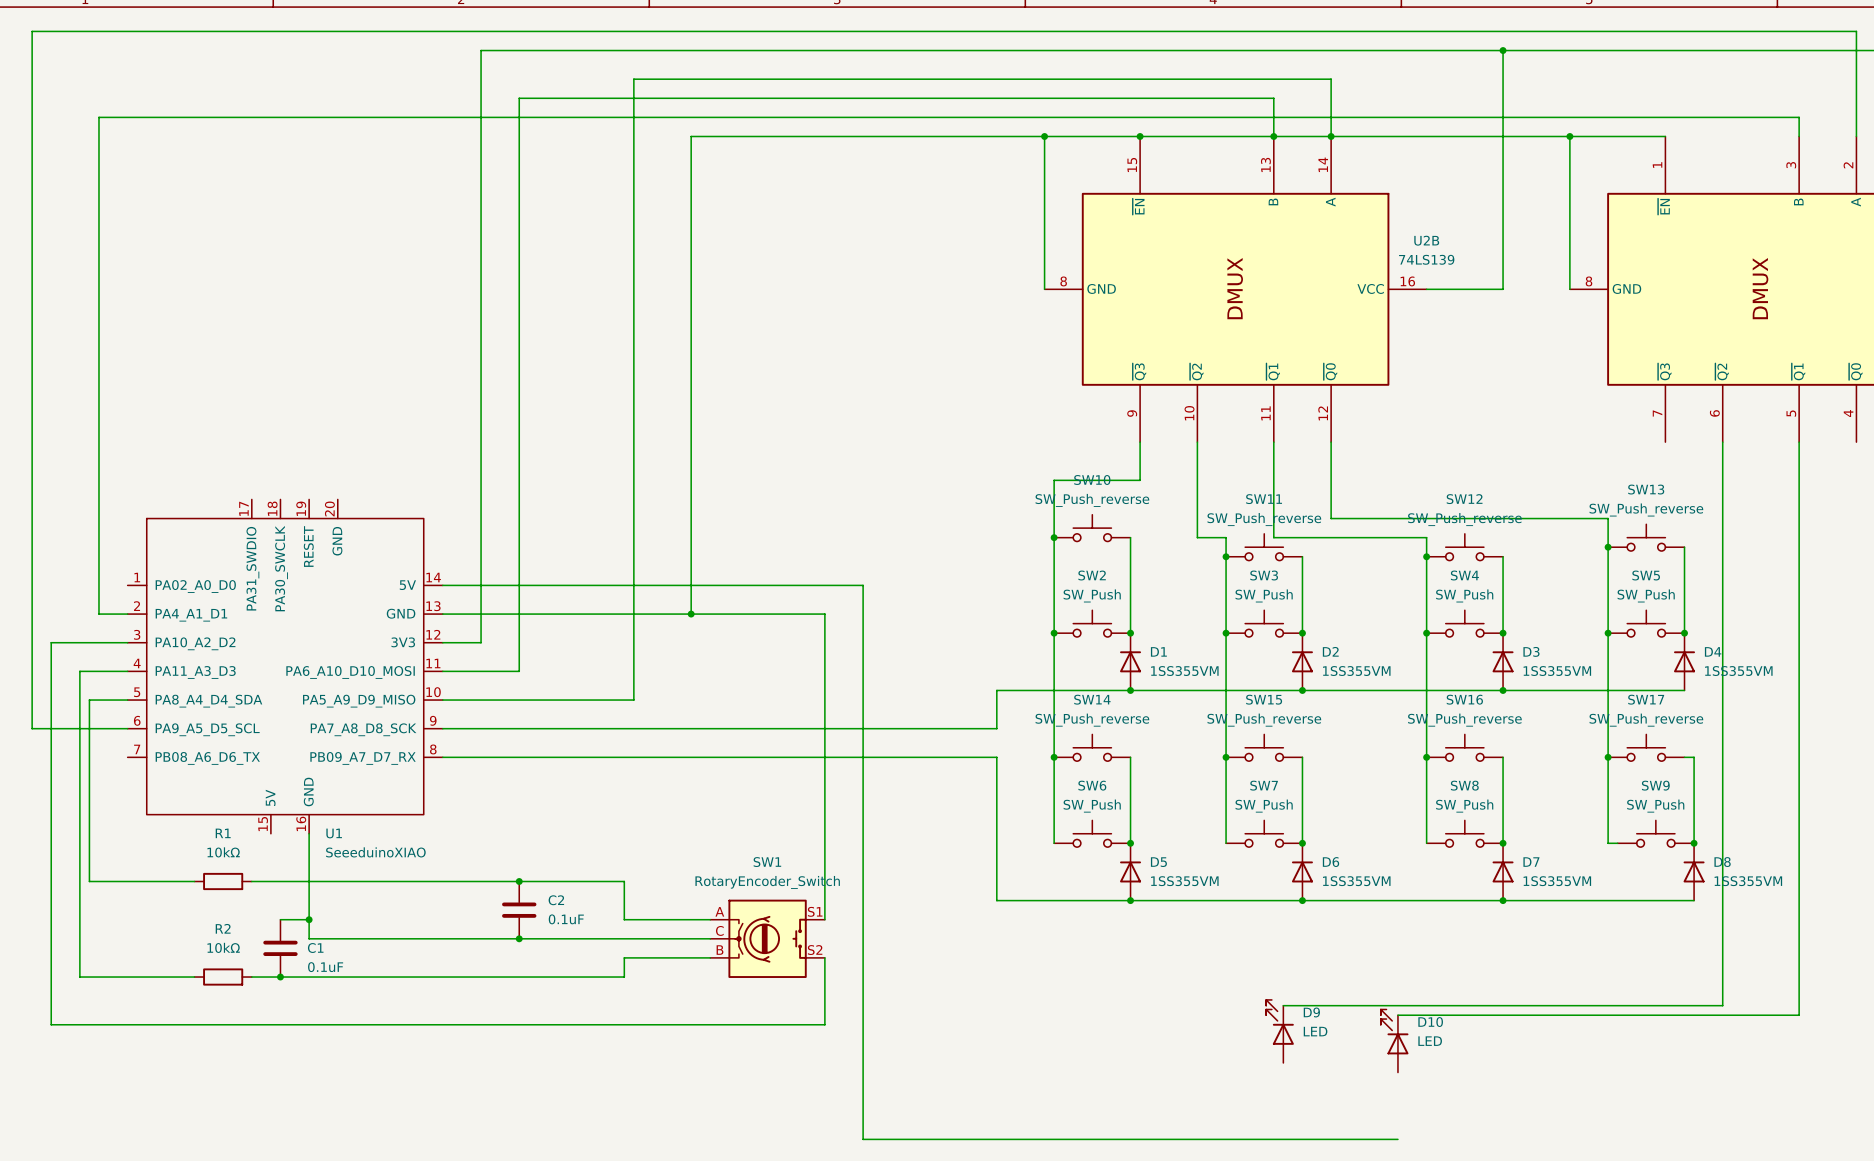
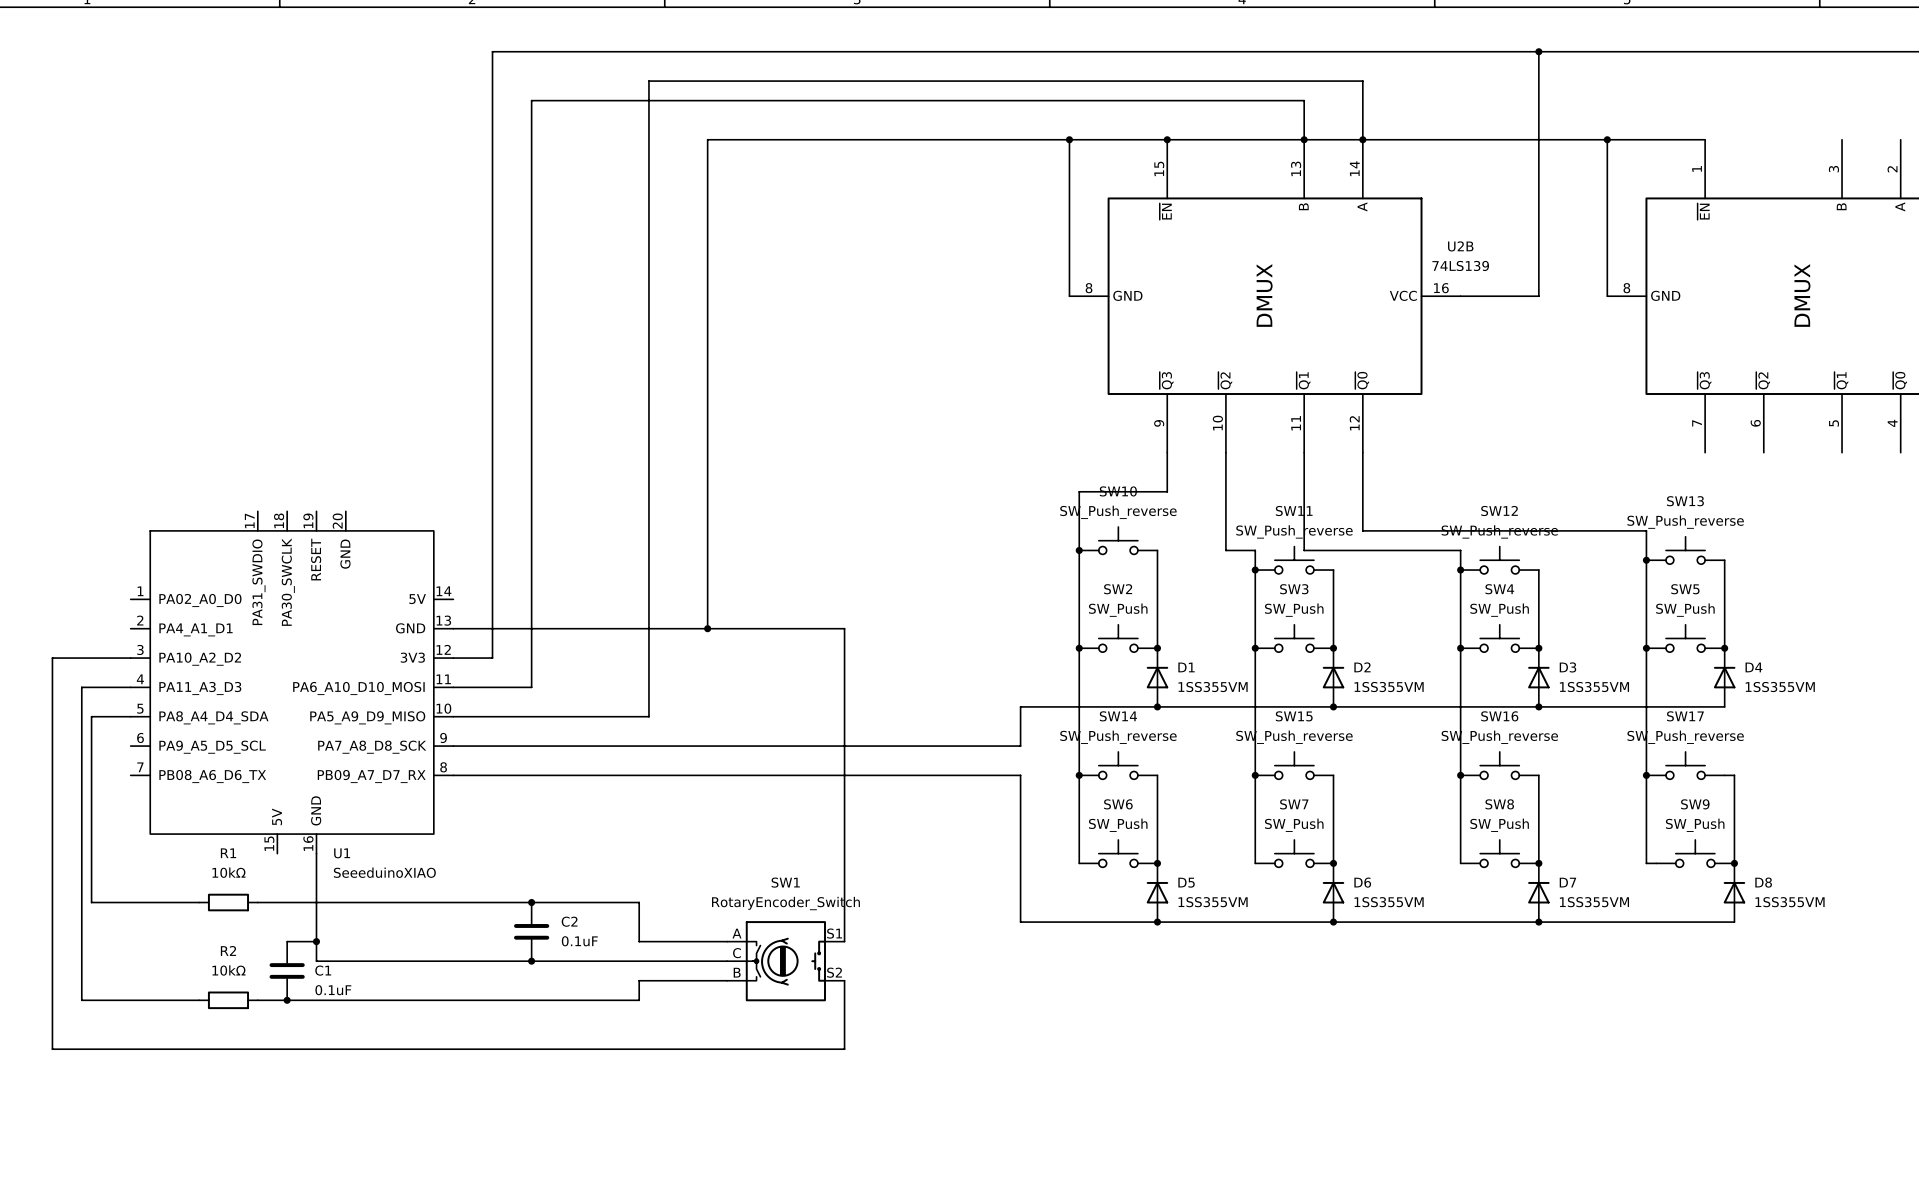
wire: (1799, 136) (1799, 117) (98, 117) (98, 614) (127, 614) -> none
wire: (1856, 136) (1856, 31) (32, 31) (32, 728) (127, 728) -> none
wire: (1722, 442) (1722, 1005) (1283, 1005) -> none
wire: (1799, 442) (1799, 1015) (1397, 1015) -> none
wire: (442, 585) (863, 585) (863, 1139) (1397, 1139) -> none
D9: LED (1280, 1031) -> none
D10: LED (1394, 1041) -> none

